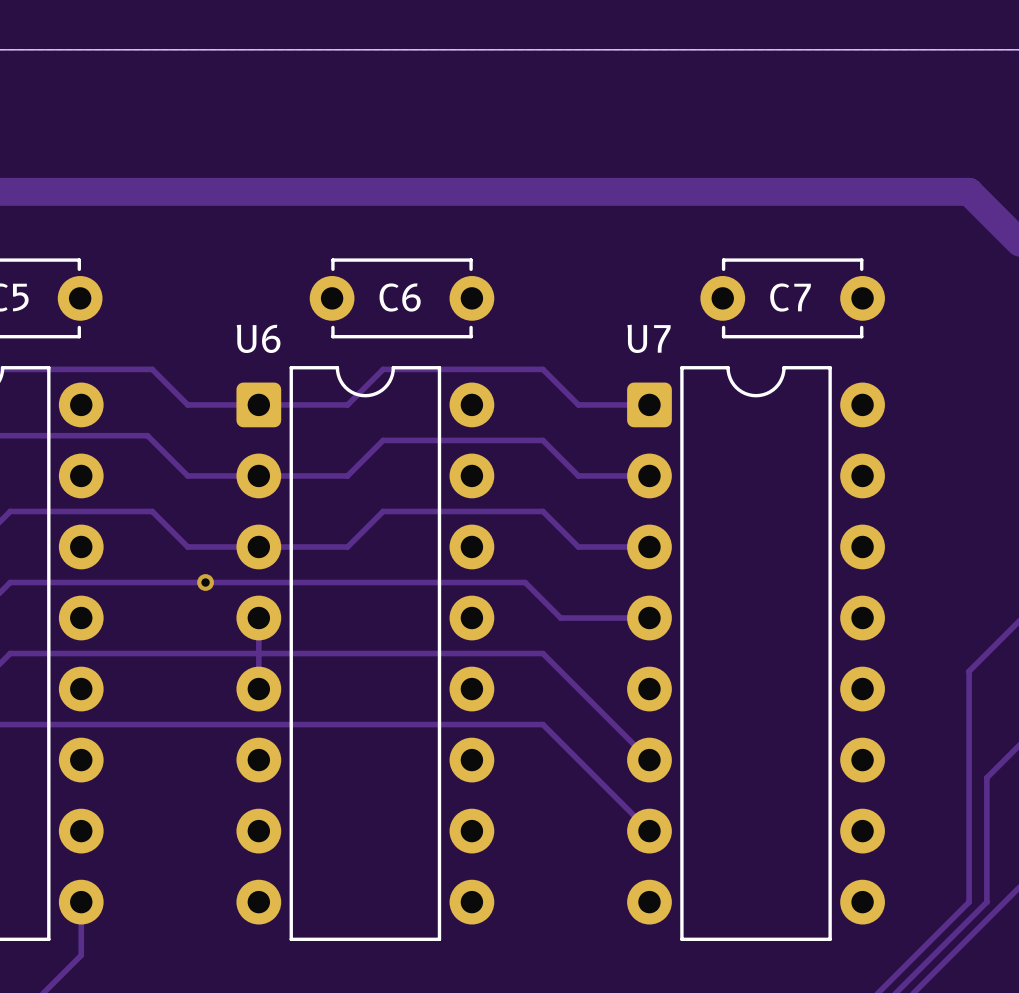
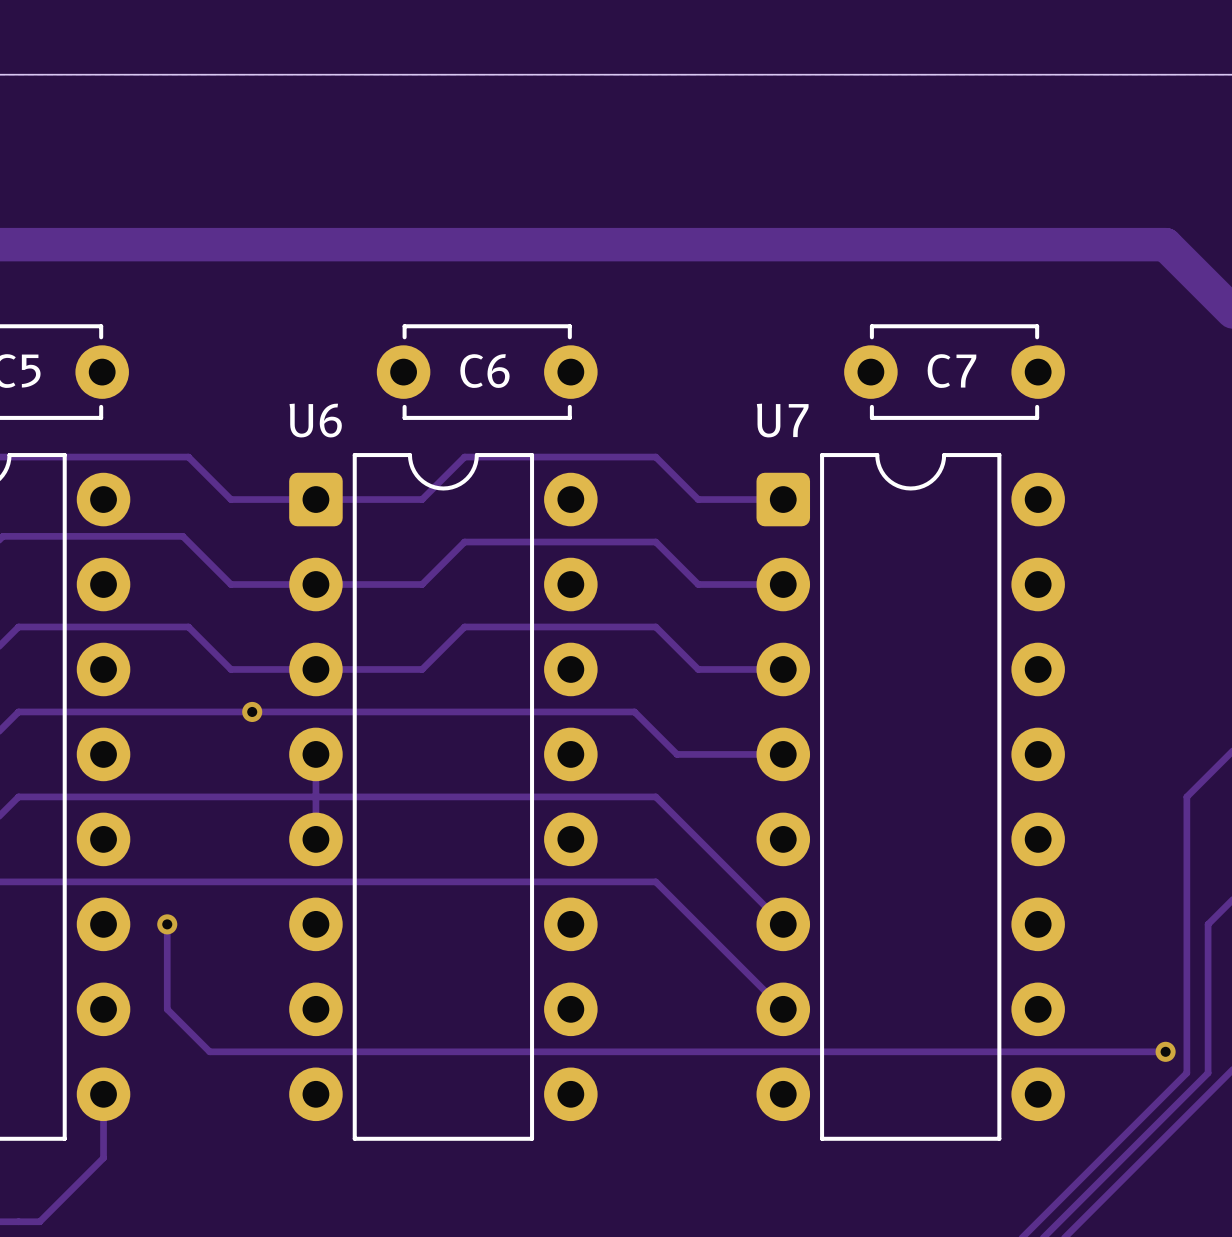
track: (986, 653) (969, 671) (969, 902) -> none
track: none -> (167, 924) (167, 1009) (209, 1051) (1165, 1051)
via: none -> (167, 924)
track: (1004, 760) (986, 777) -> (1186, 796) (1186, 945)
track: none -> (1208, 924) (1208, 1073) (1186, 1094)
via: none -> (1165, 1051)
track: (986, 884) (986, 902) -> (1186, 1073) (1165, 1094)

